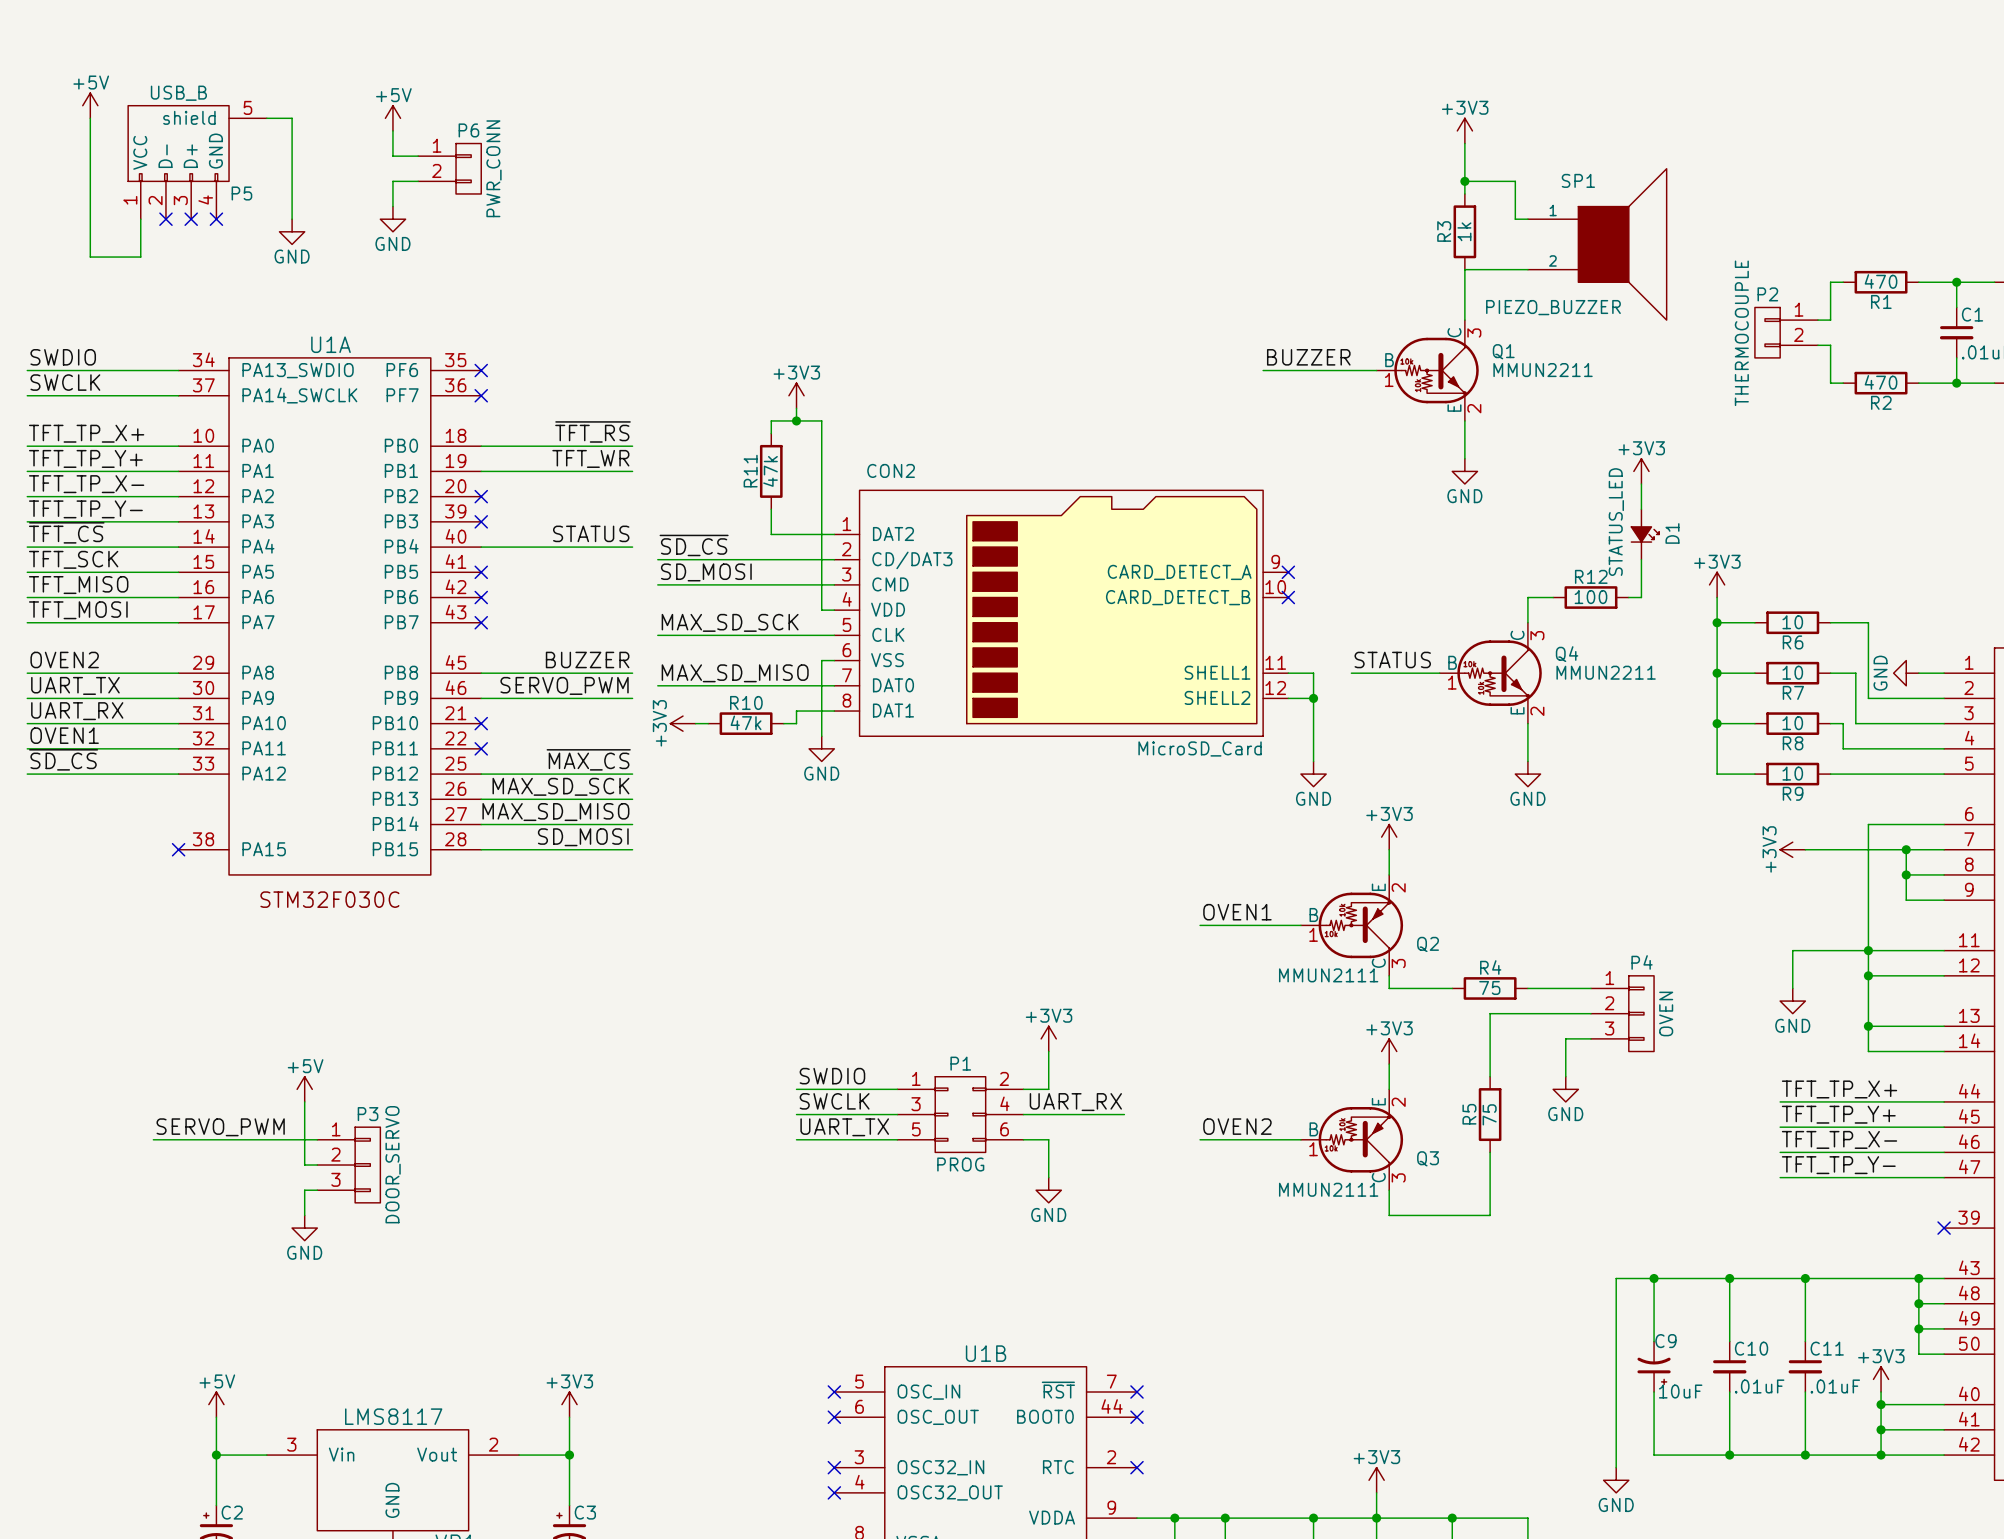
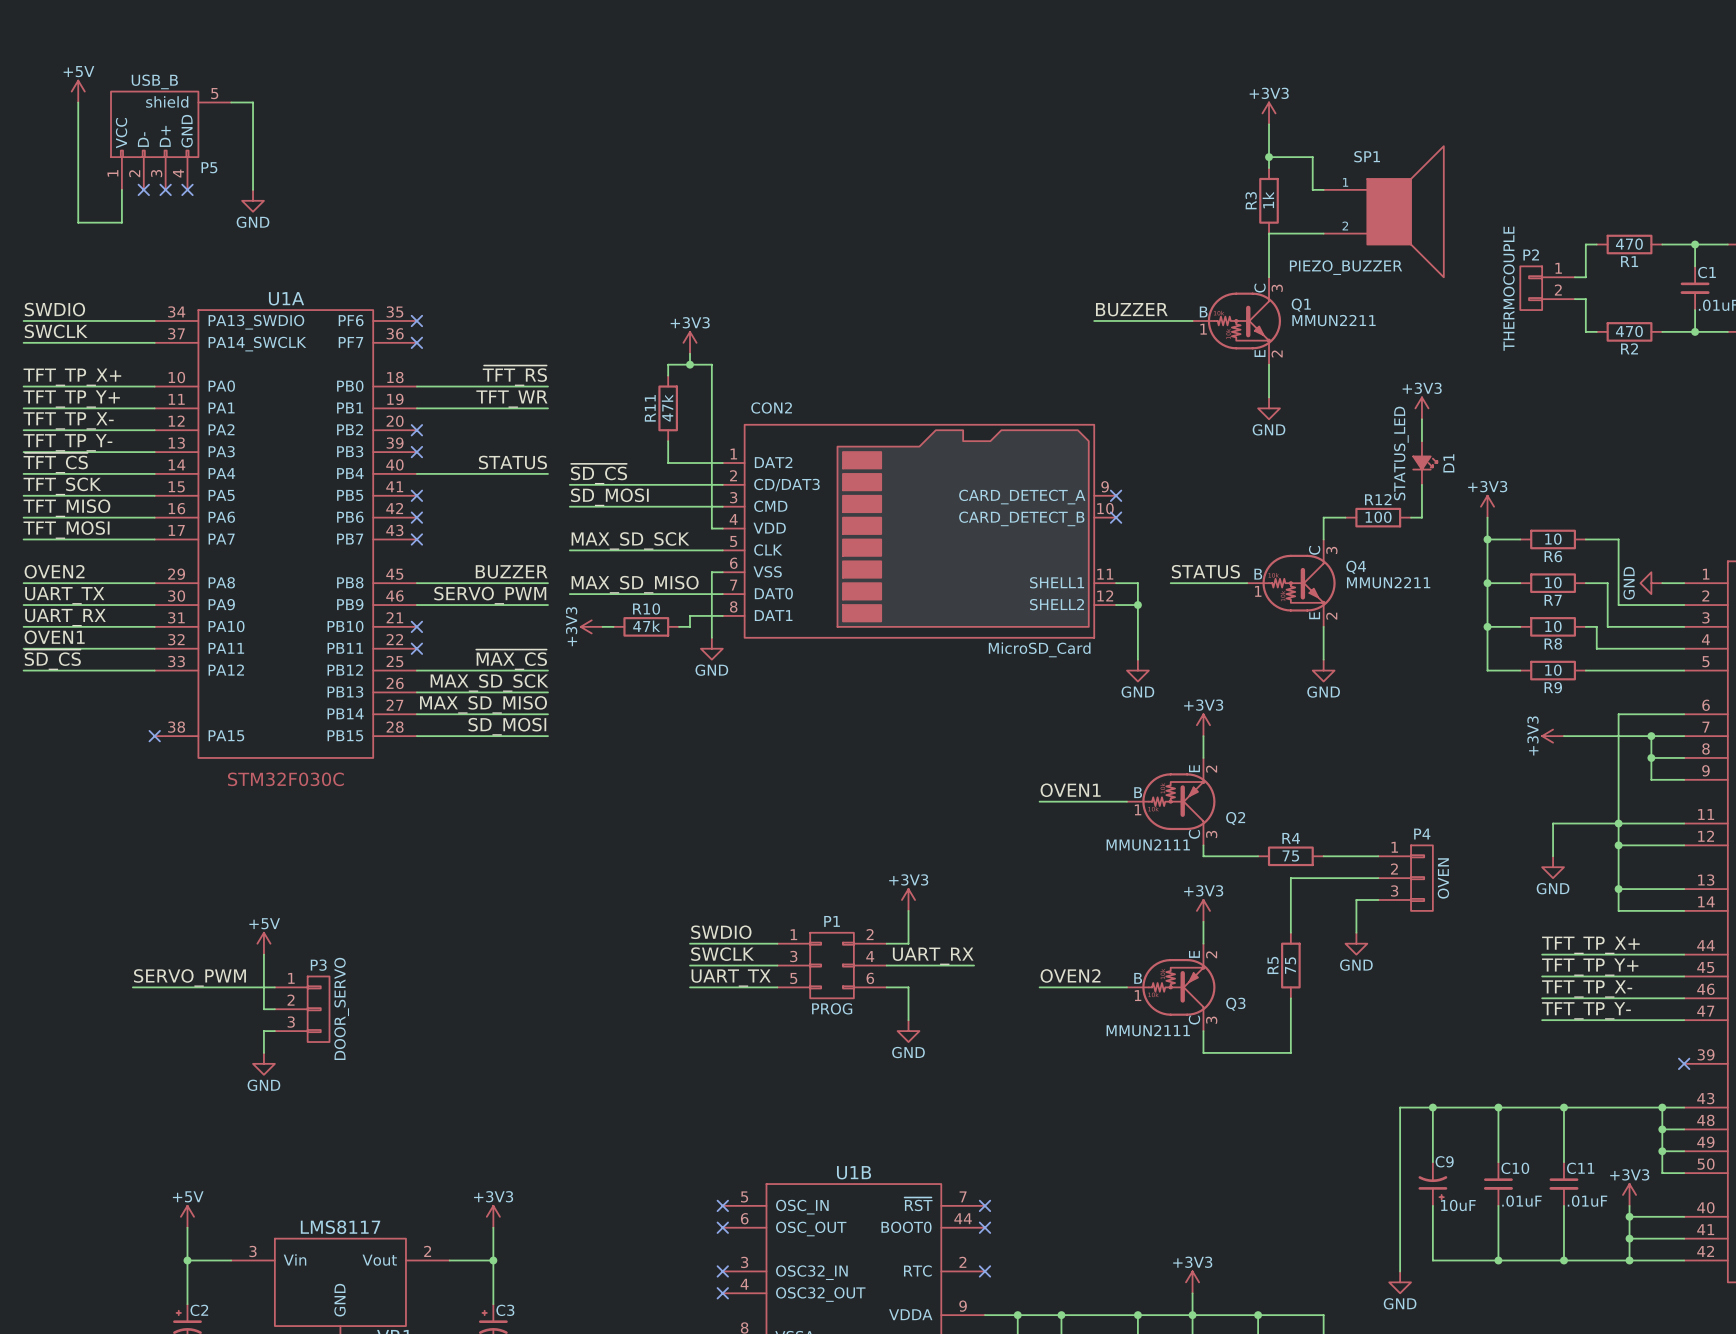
power symbol: +5V (392, 118) -> none
wire: (392, 130) (392, 156) (418, 156) -> none
P6: PWR_CONN (449, 168) -> none
wire: (418, 181) (392, 181) (392, 206) -> none
power symbol: GND (392, 219) -> none

